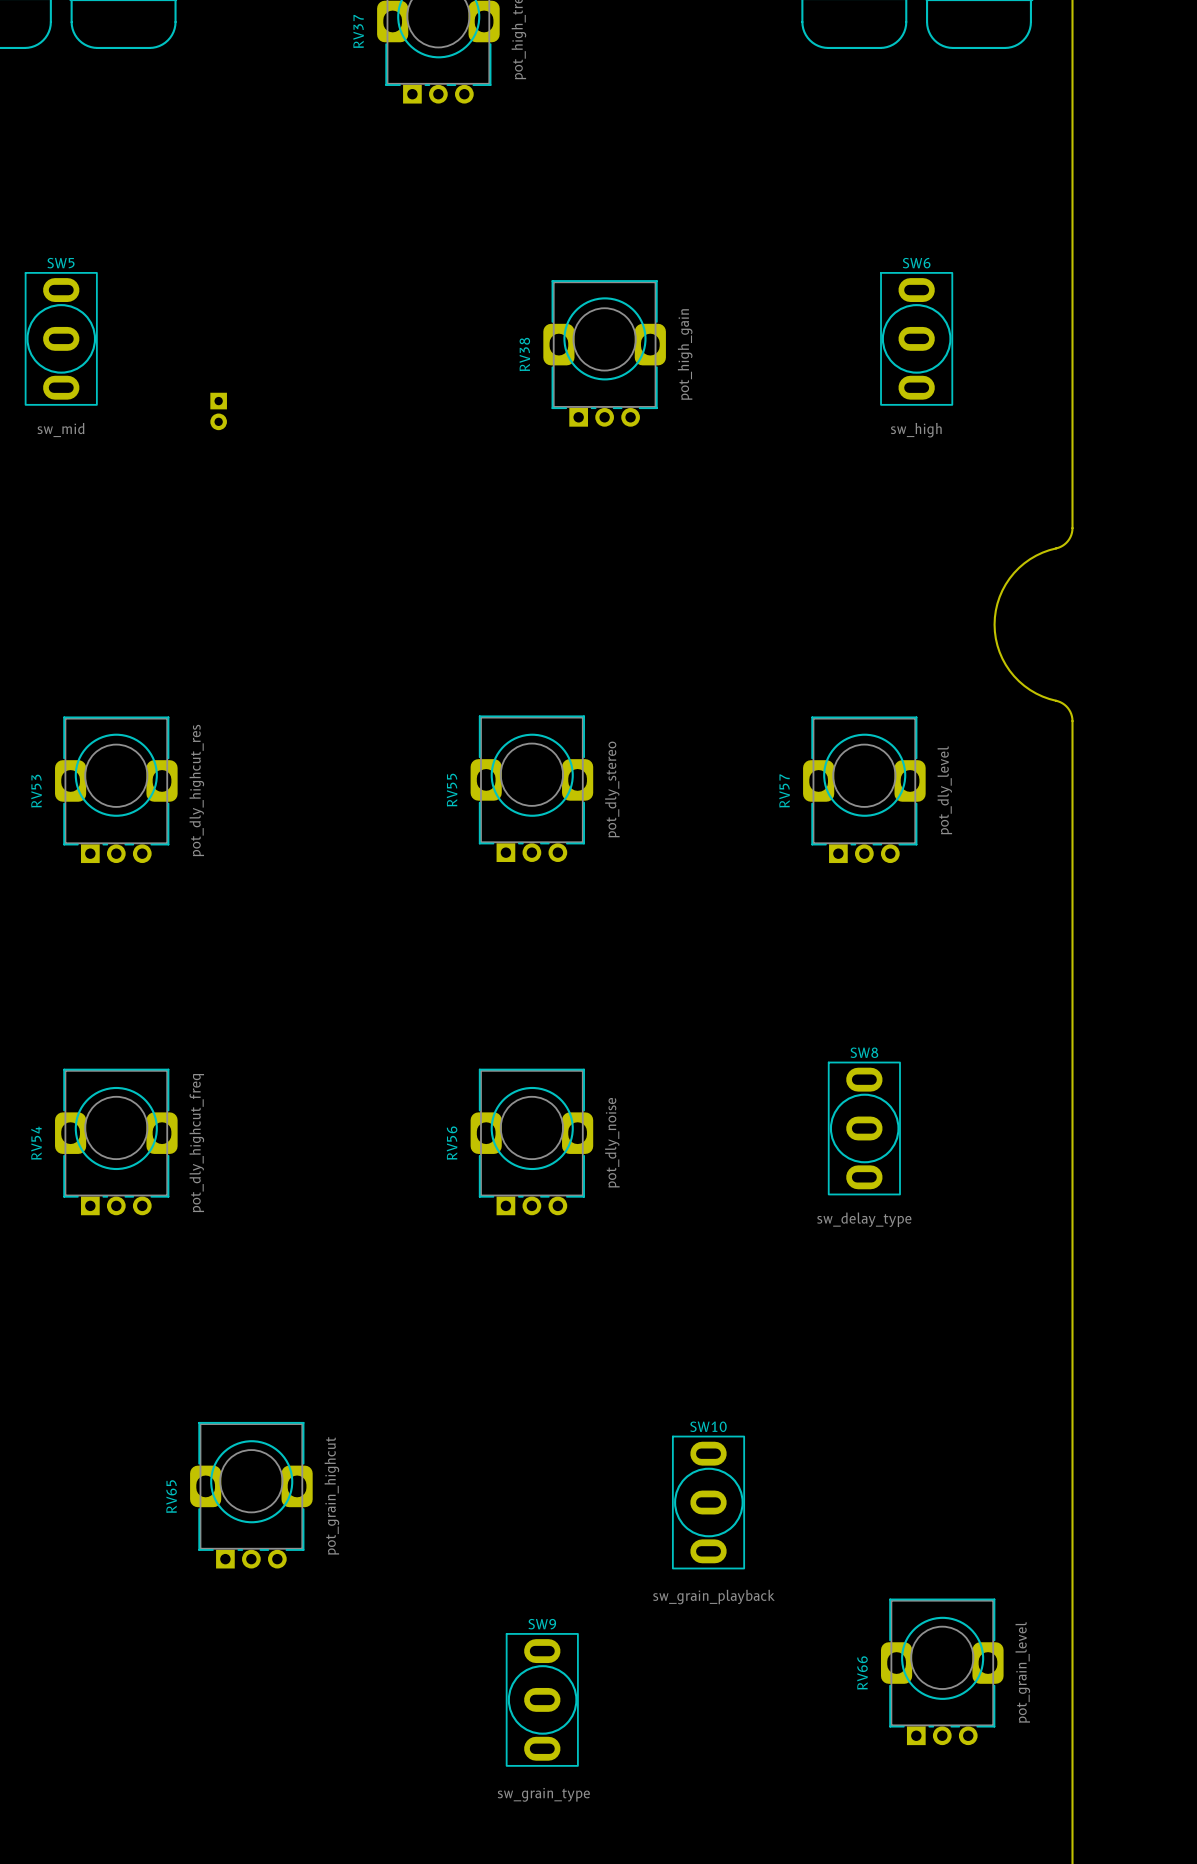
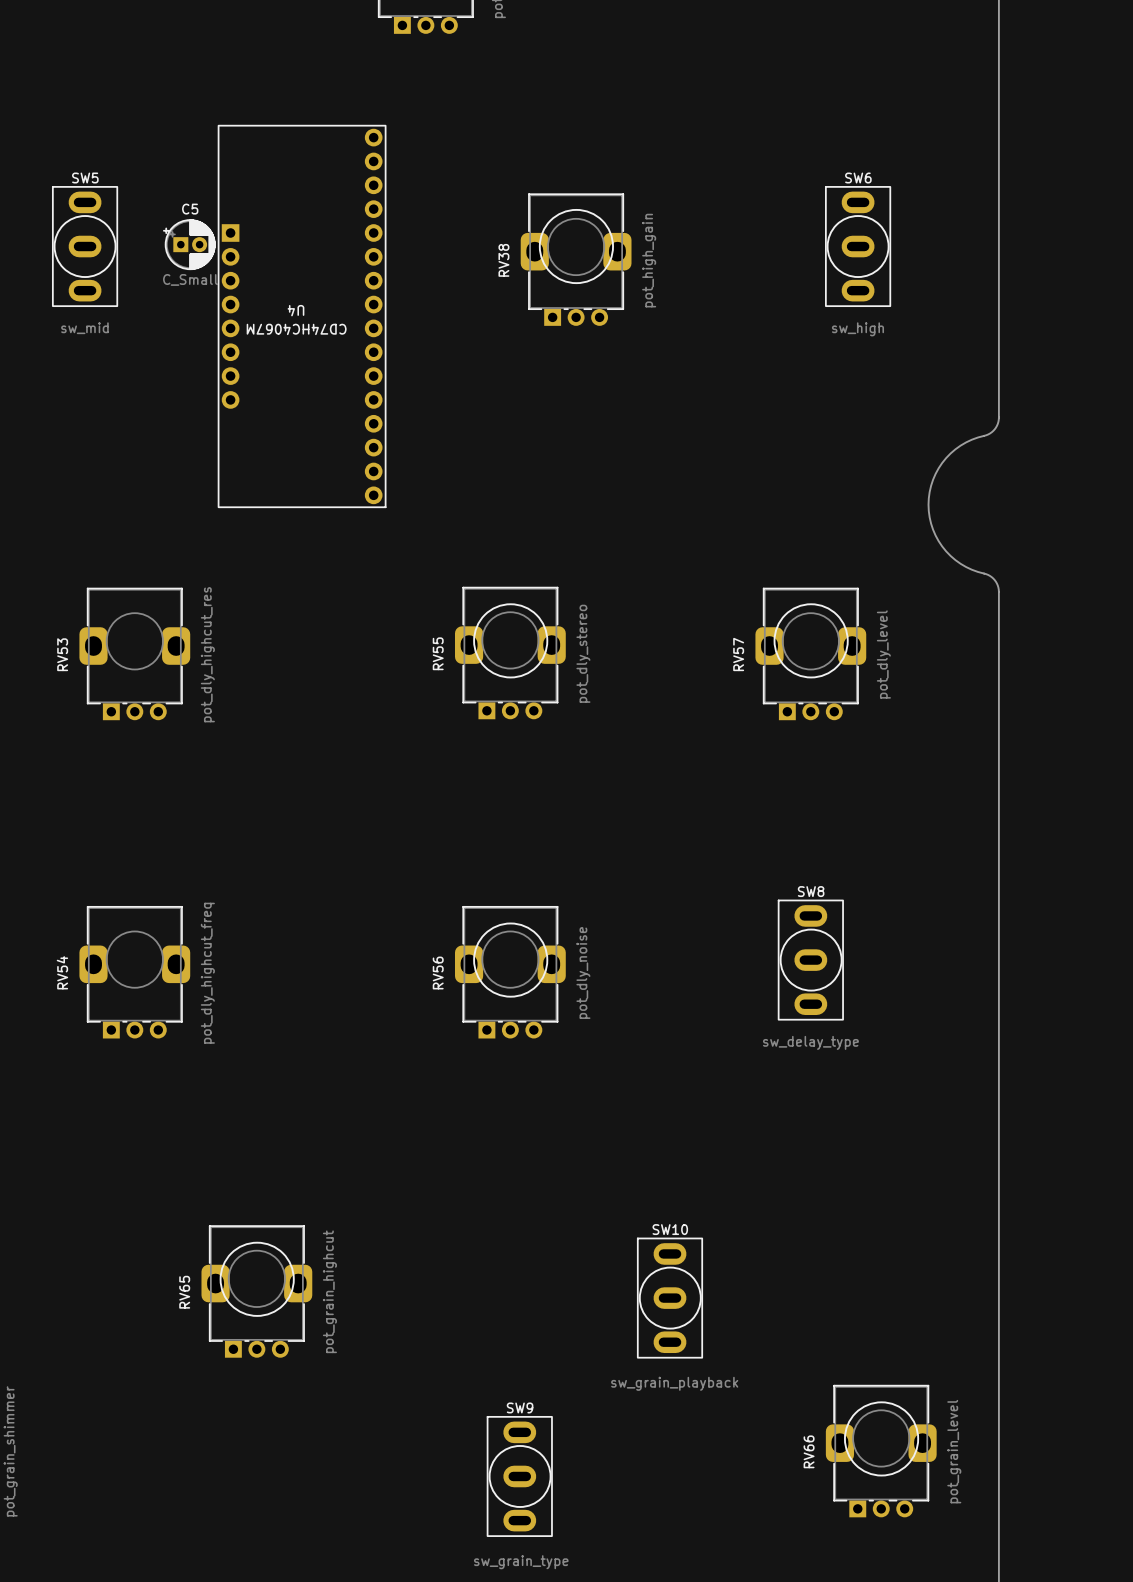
C5 side: bottom (218, 411) -> top (189, 244)
U4: none -> CD74HC4067M (302, 316)
drawing: [74, 733, 158, 817] -> none
drawing: [74, 1086, 158, 1171] -> none

